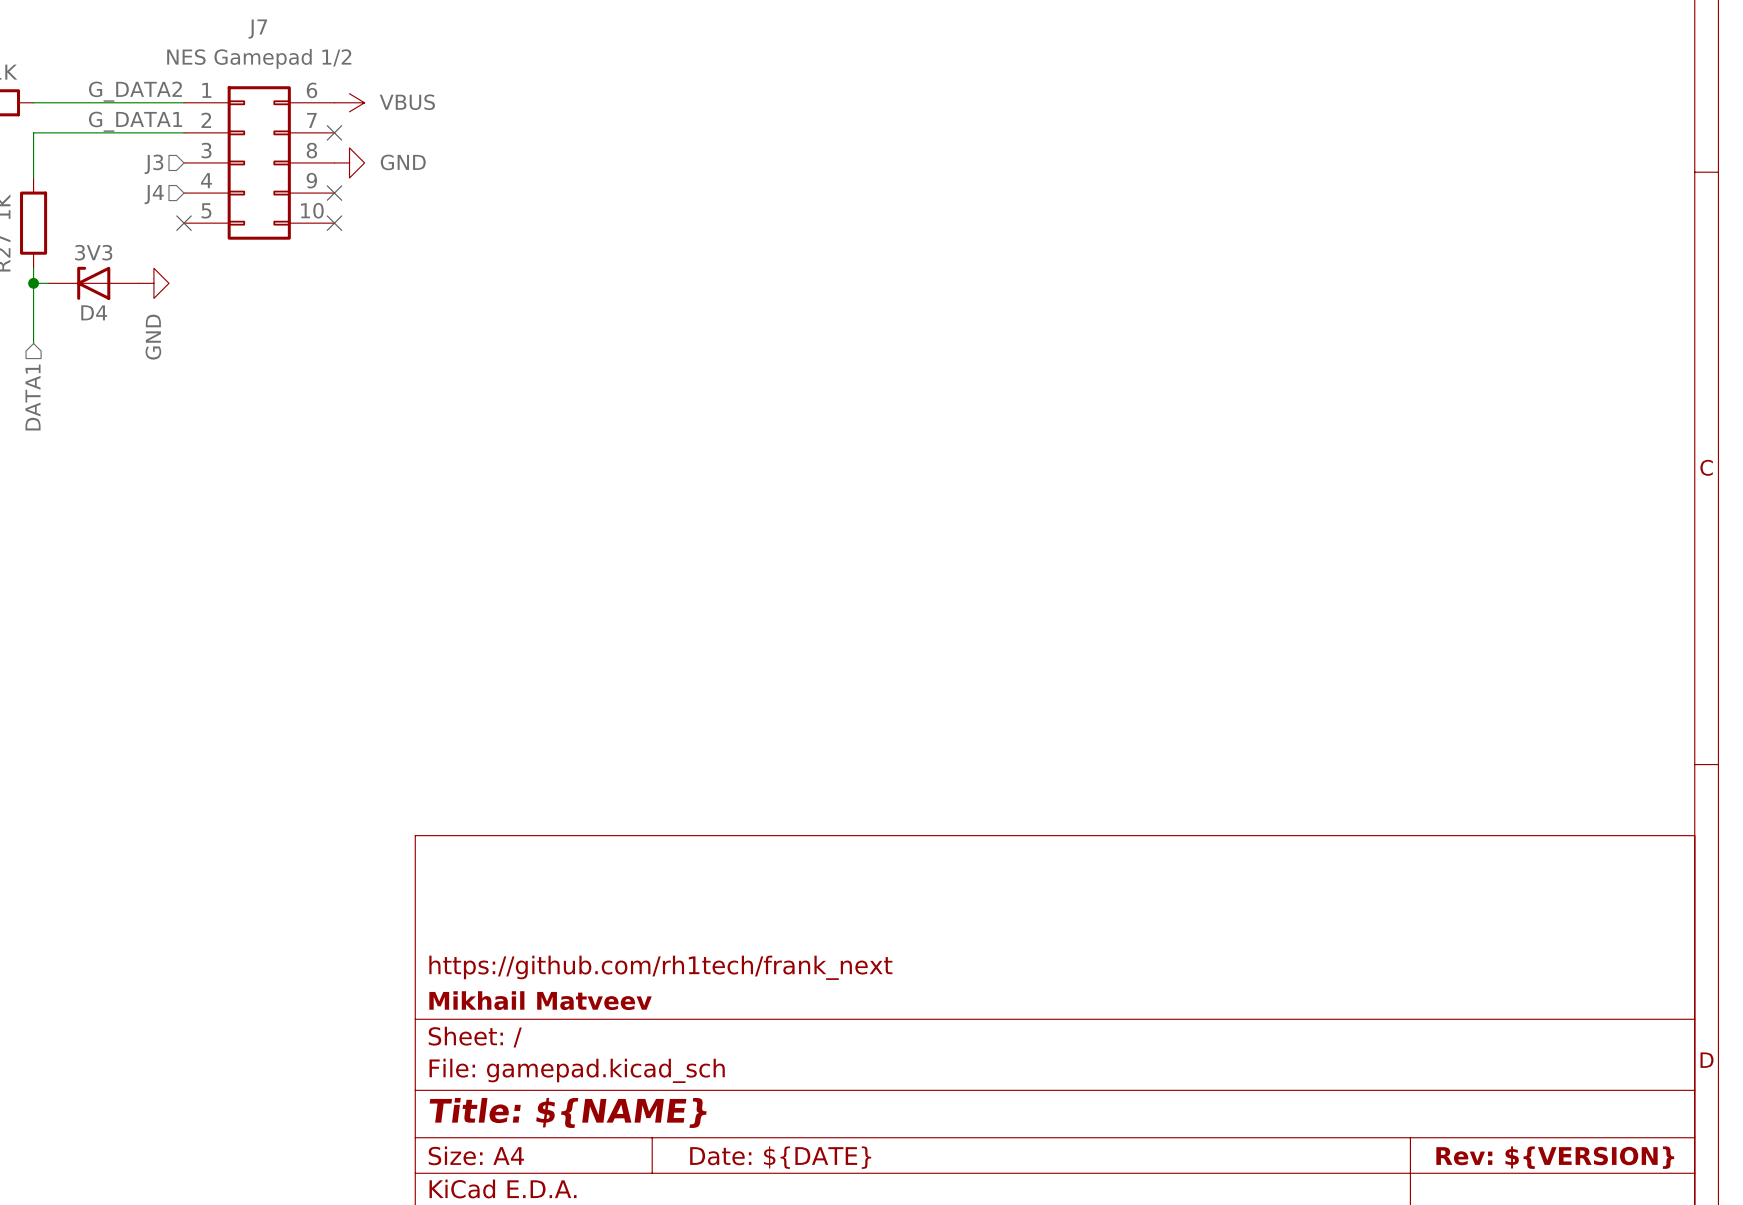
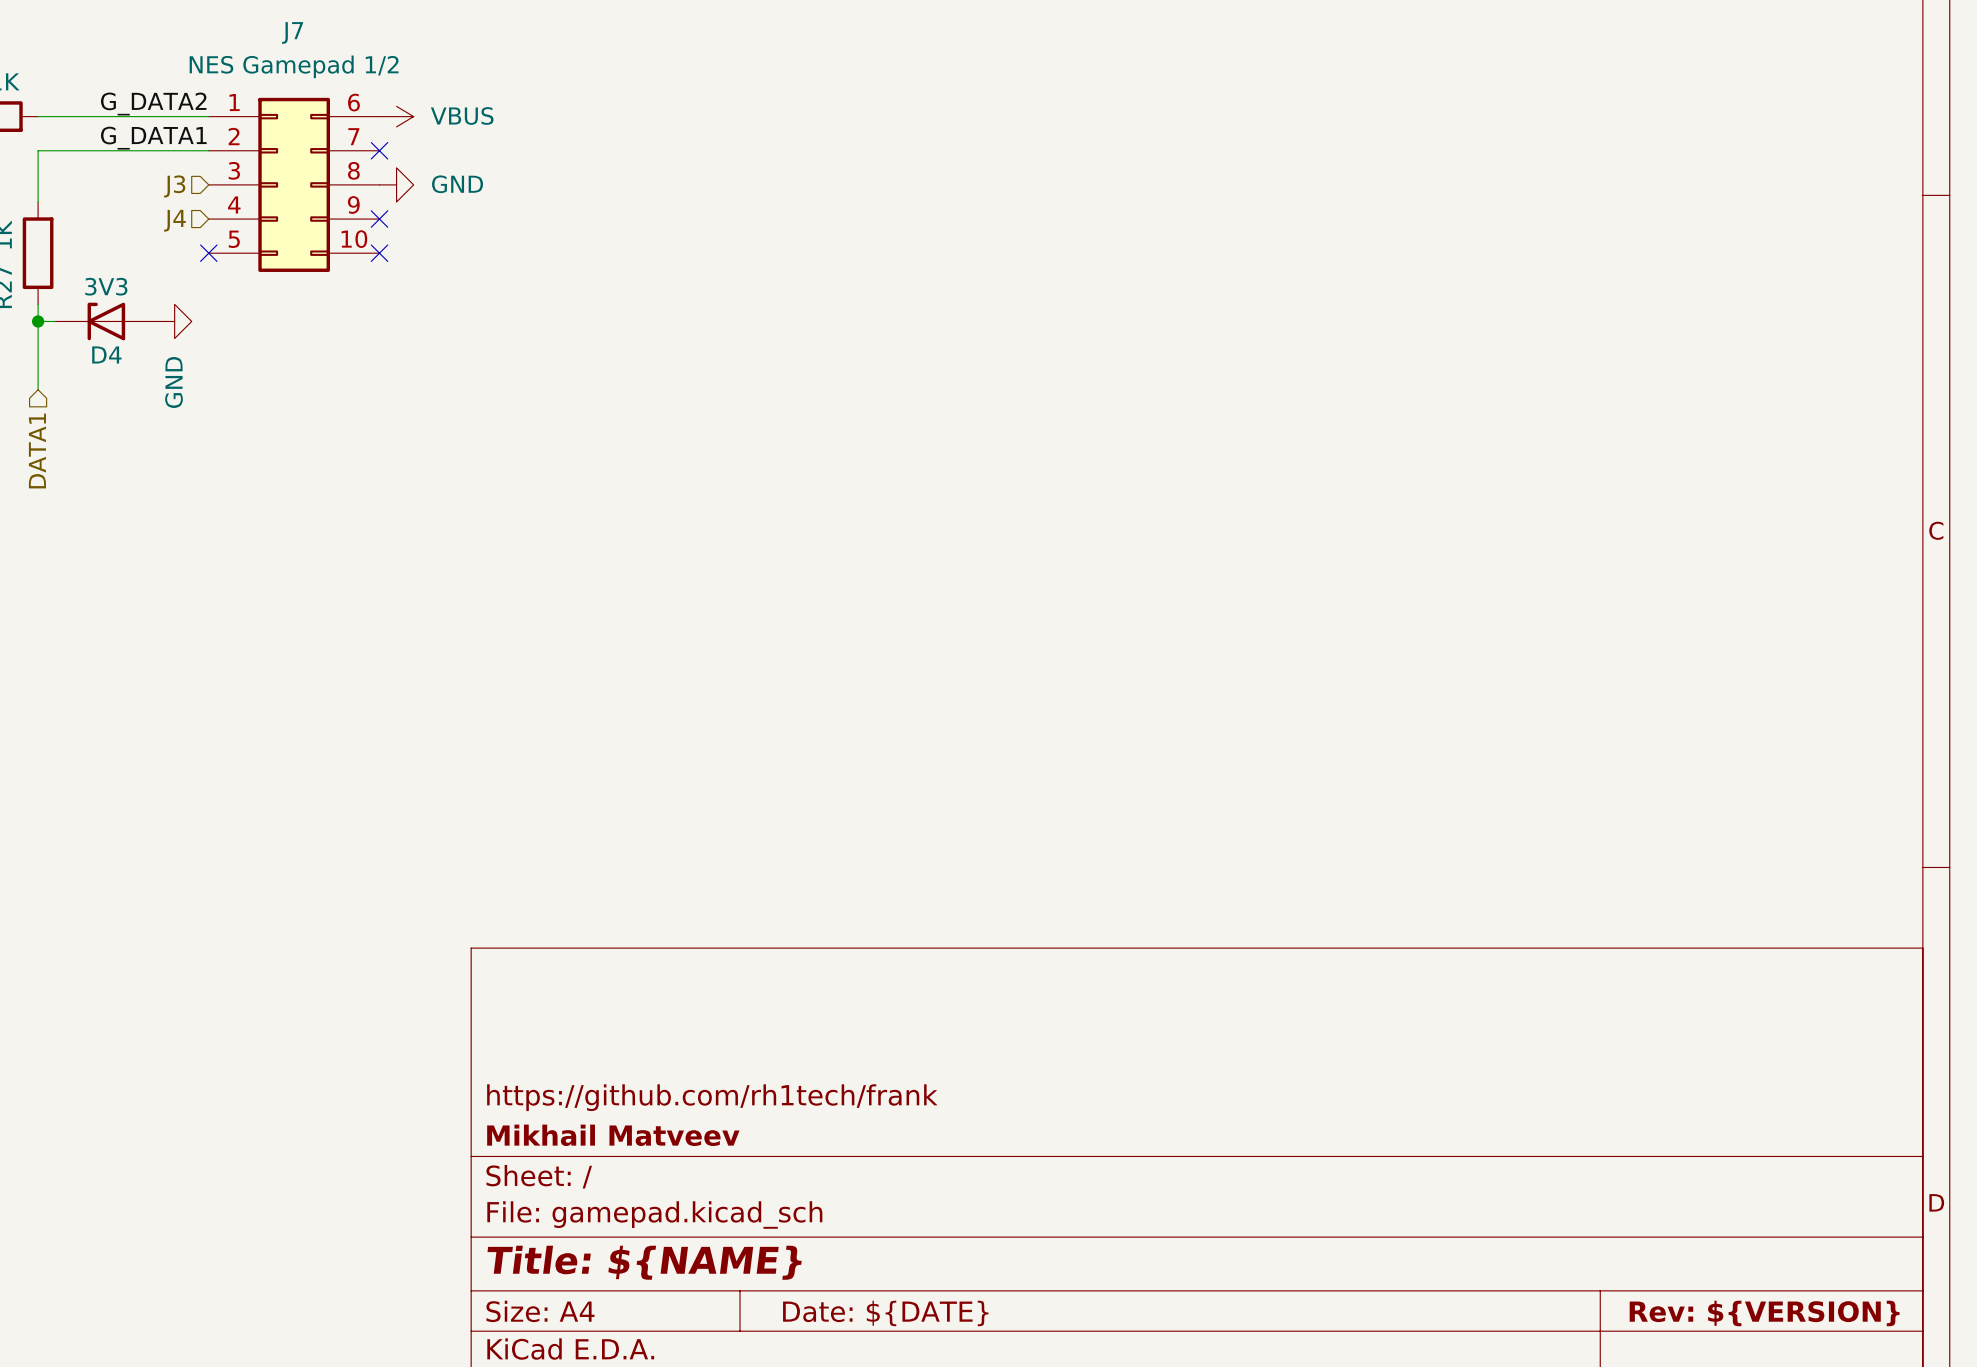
title block: https://github.com/rh1tech/frank_next (660, 967) -> https://github.com/rh1tech/frank (712, 1097)

